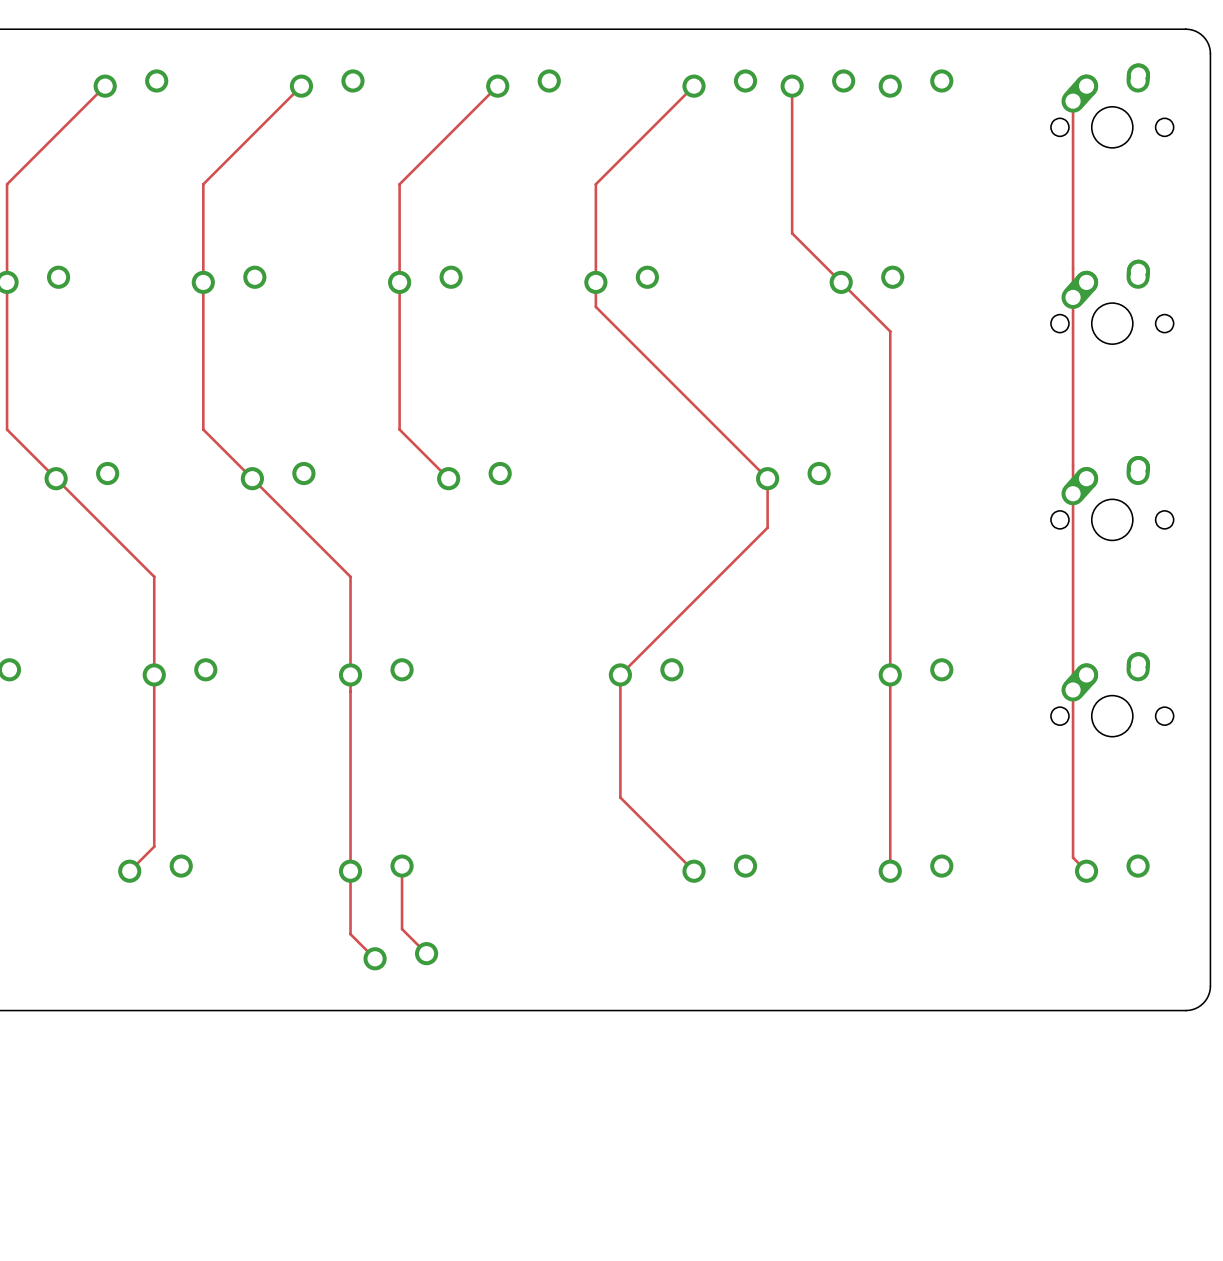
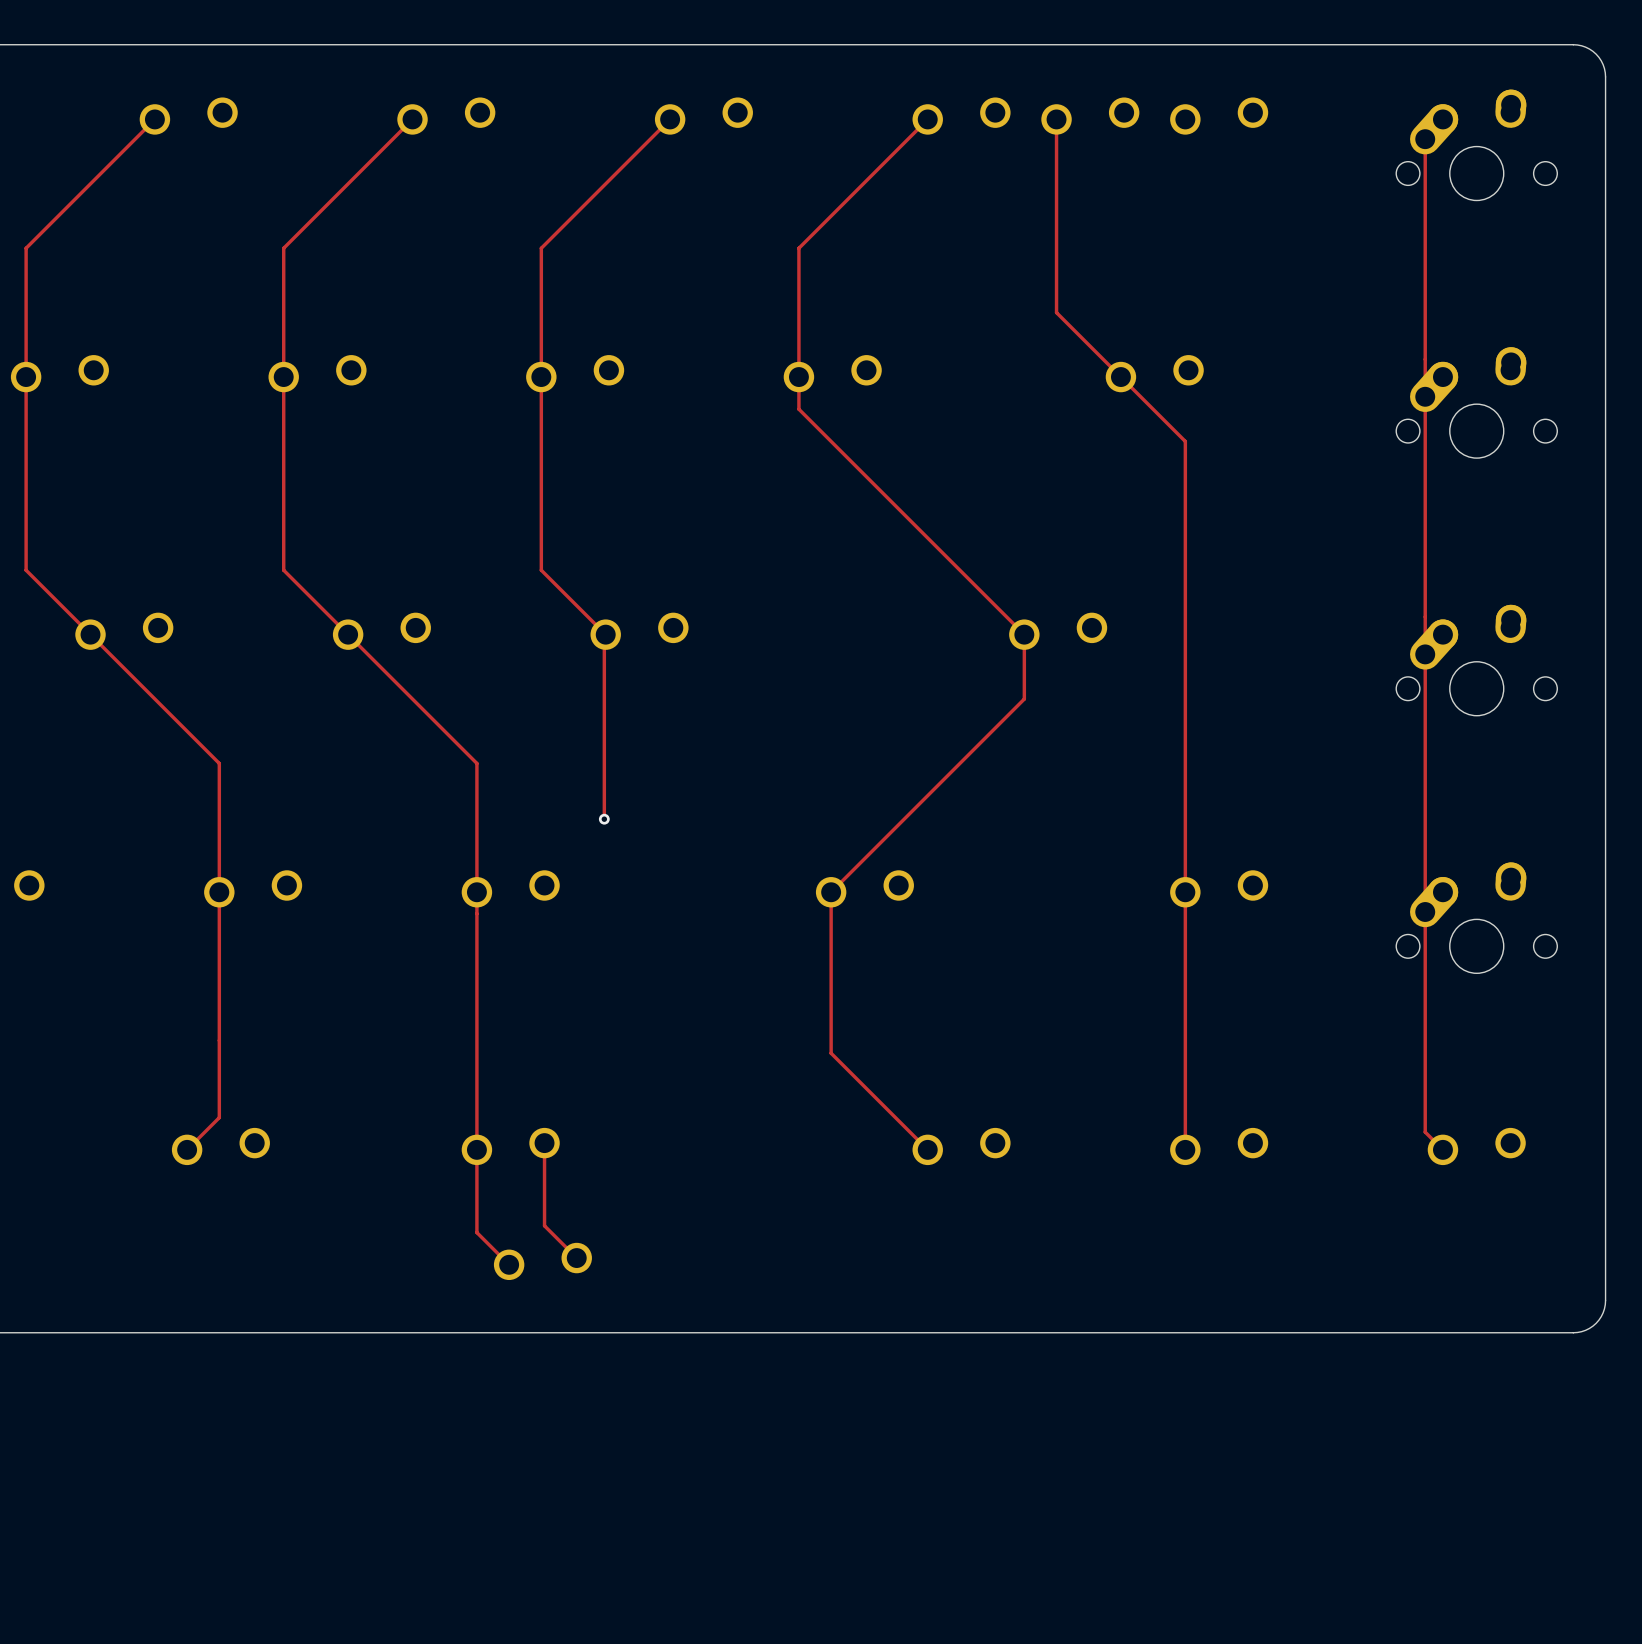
track: none -> (605, 634) (604, 819)
via: none -> (604, 819)

